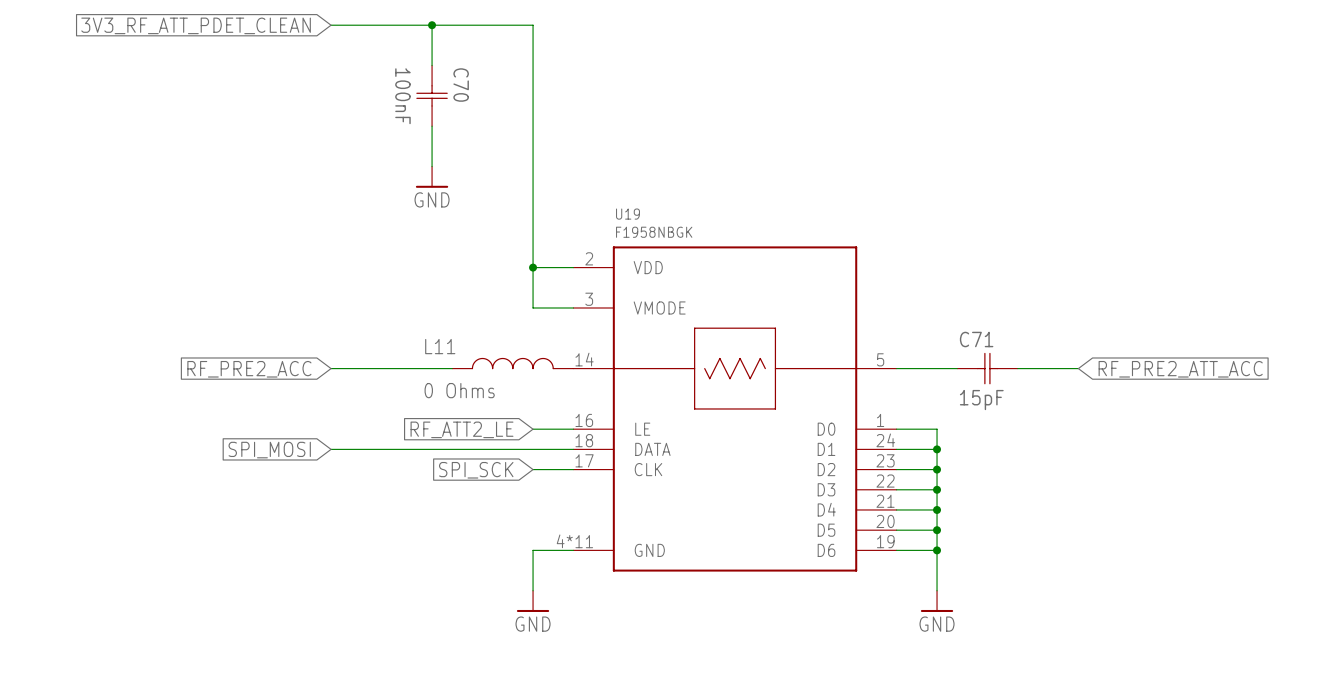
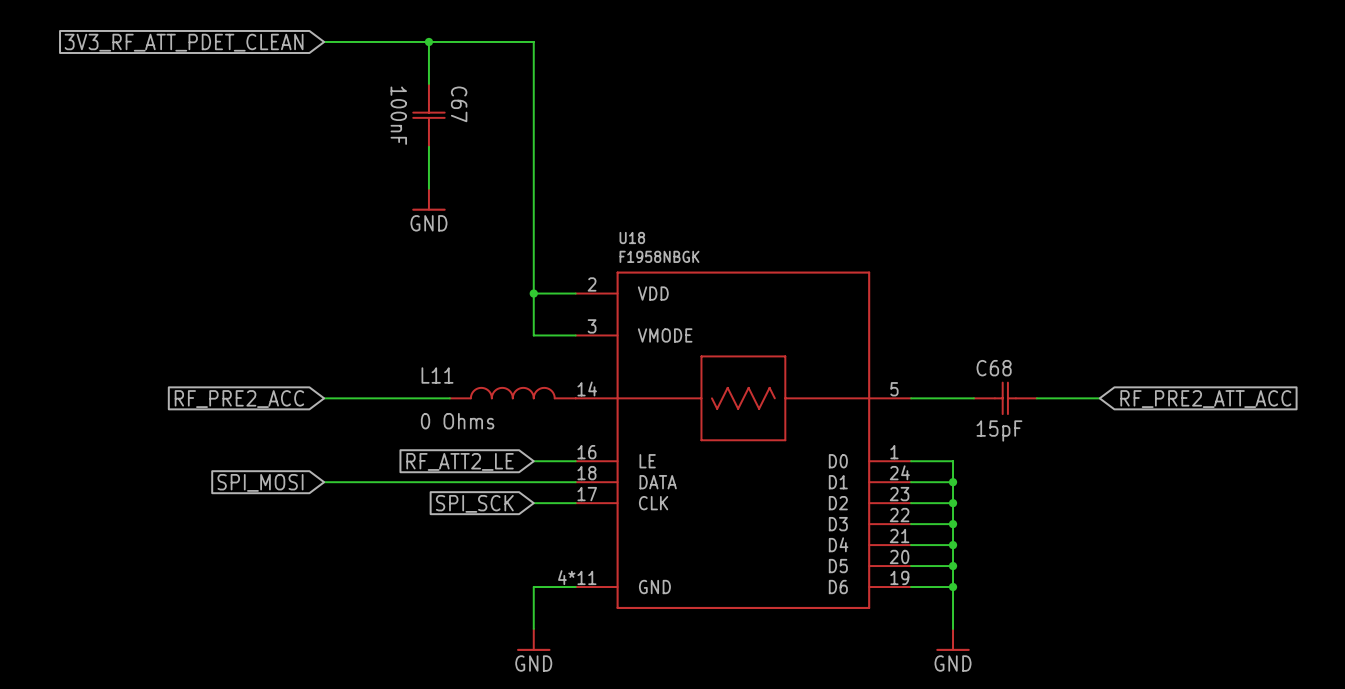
C70 name: C70 (461, 85) -> C67 (459, 104)
U19 name: U19 (628, 214) -> U18 (632, 237)
C71 name: C71 (976, 339) -> C68 (994, 368)

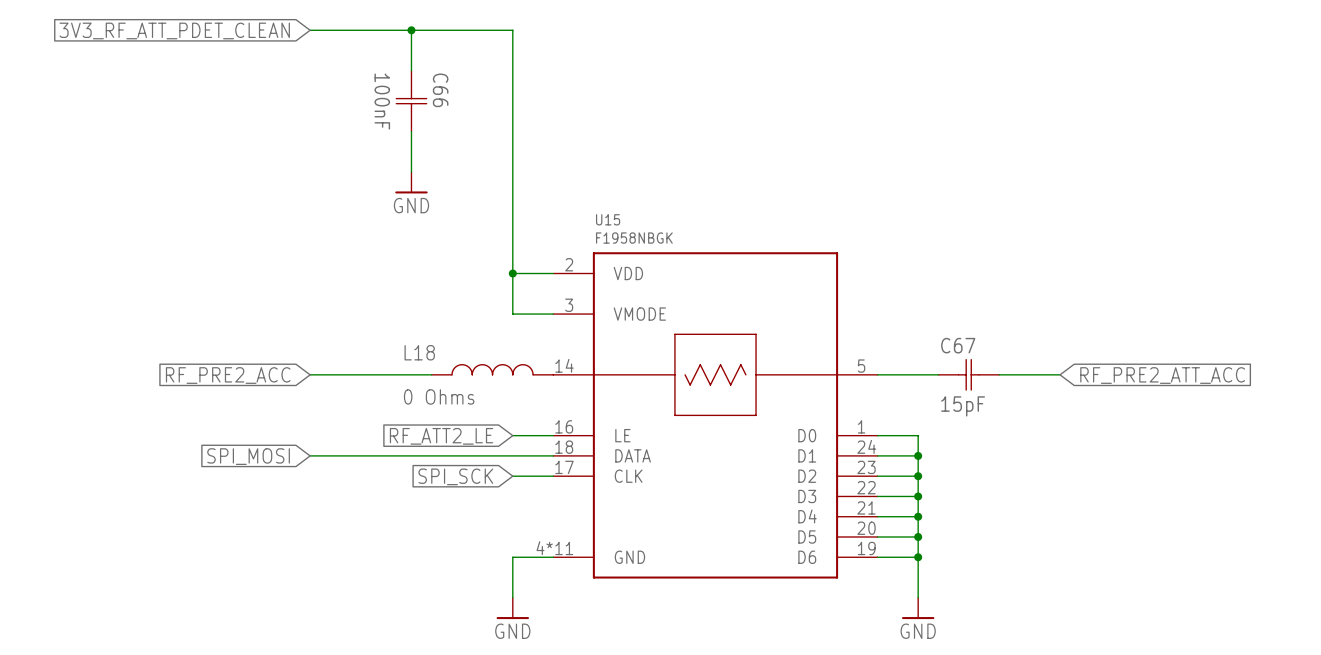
C67 name: C67 (459, 104) -> C66 (440, 90)
U18 name: U18 (632, 237) -> U15 (608, 219)
C68 name: C68 (994, 368) -> C67 (958, 345)
L11 name: L11 (437, 375) -> L18 (419, 352)

